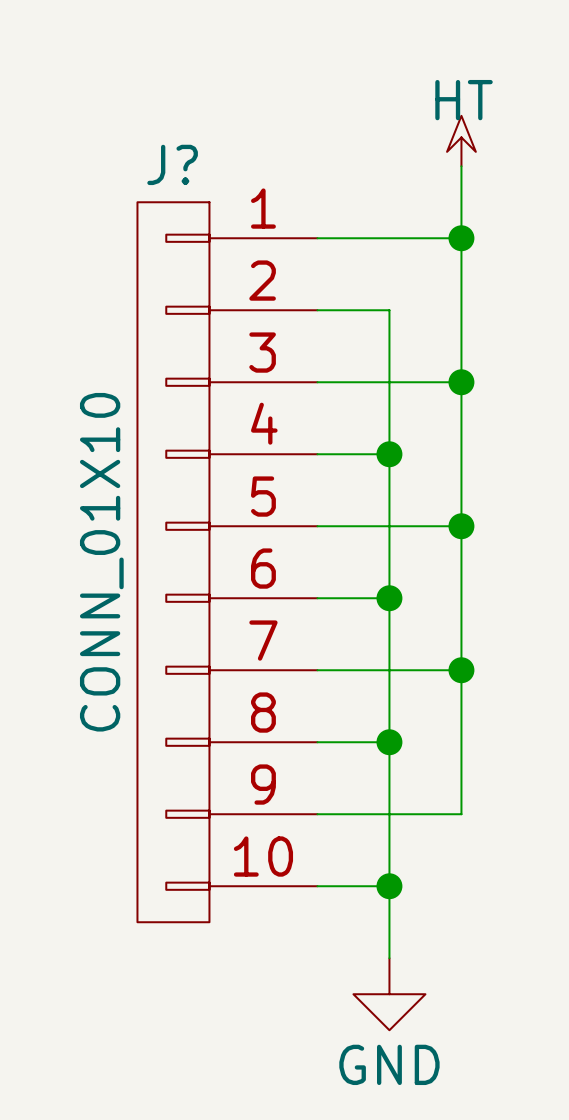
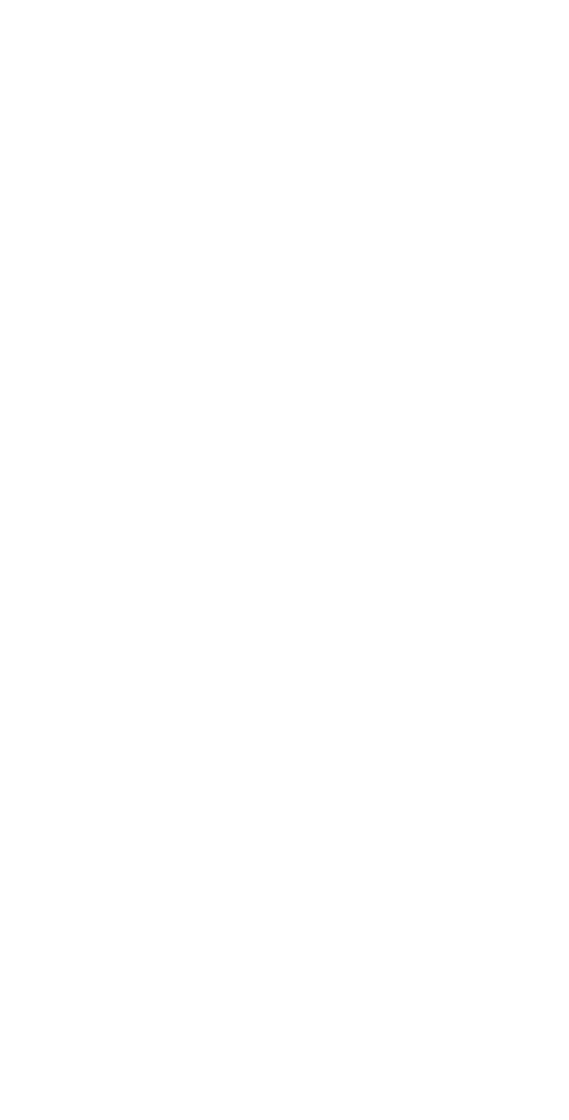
power symbol: HT (461, 141) -> none
wire: (461, 166) (461, 814) (317, 814) -> none
wire: (317, 238) (461, 238) -> none
junction: (461, 238) -> none
wire: (317, 310) (389, 310) (389, 958) -> none
wire: (317, 382) (461, 382) -> none
junction: (461, 382) -> none
wire: (317, 454) (389, 454) -> none
junction: (389, 454) -> none
wire: (317, 526) (461, 526) -> none
junction: (461, 526) -> none
J?: CONN_01X10 (227, 562) -> none
wire: (317, 598) (389, 598) -> none
junction: (389, 598) -> none
wire: (317, 670) (461, 670) -> none
junction: (461, 670) -> none
wire: (317, 742) (389, 742) -> none
junction: (389, 742) -> none
wire: (317, 886) (389, 886) -> none
junction: (389, 886) -> none
power symbol: GND (389, 994) -> none

